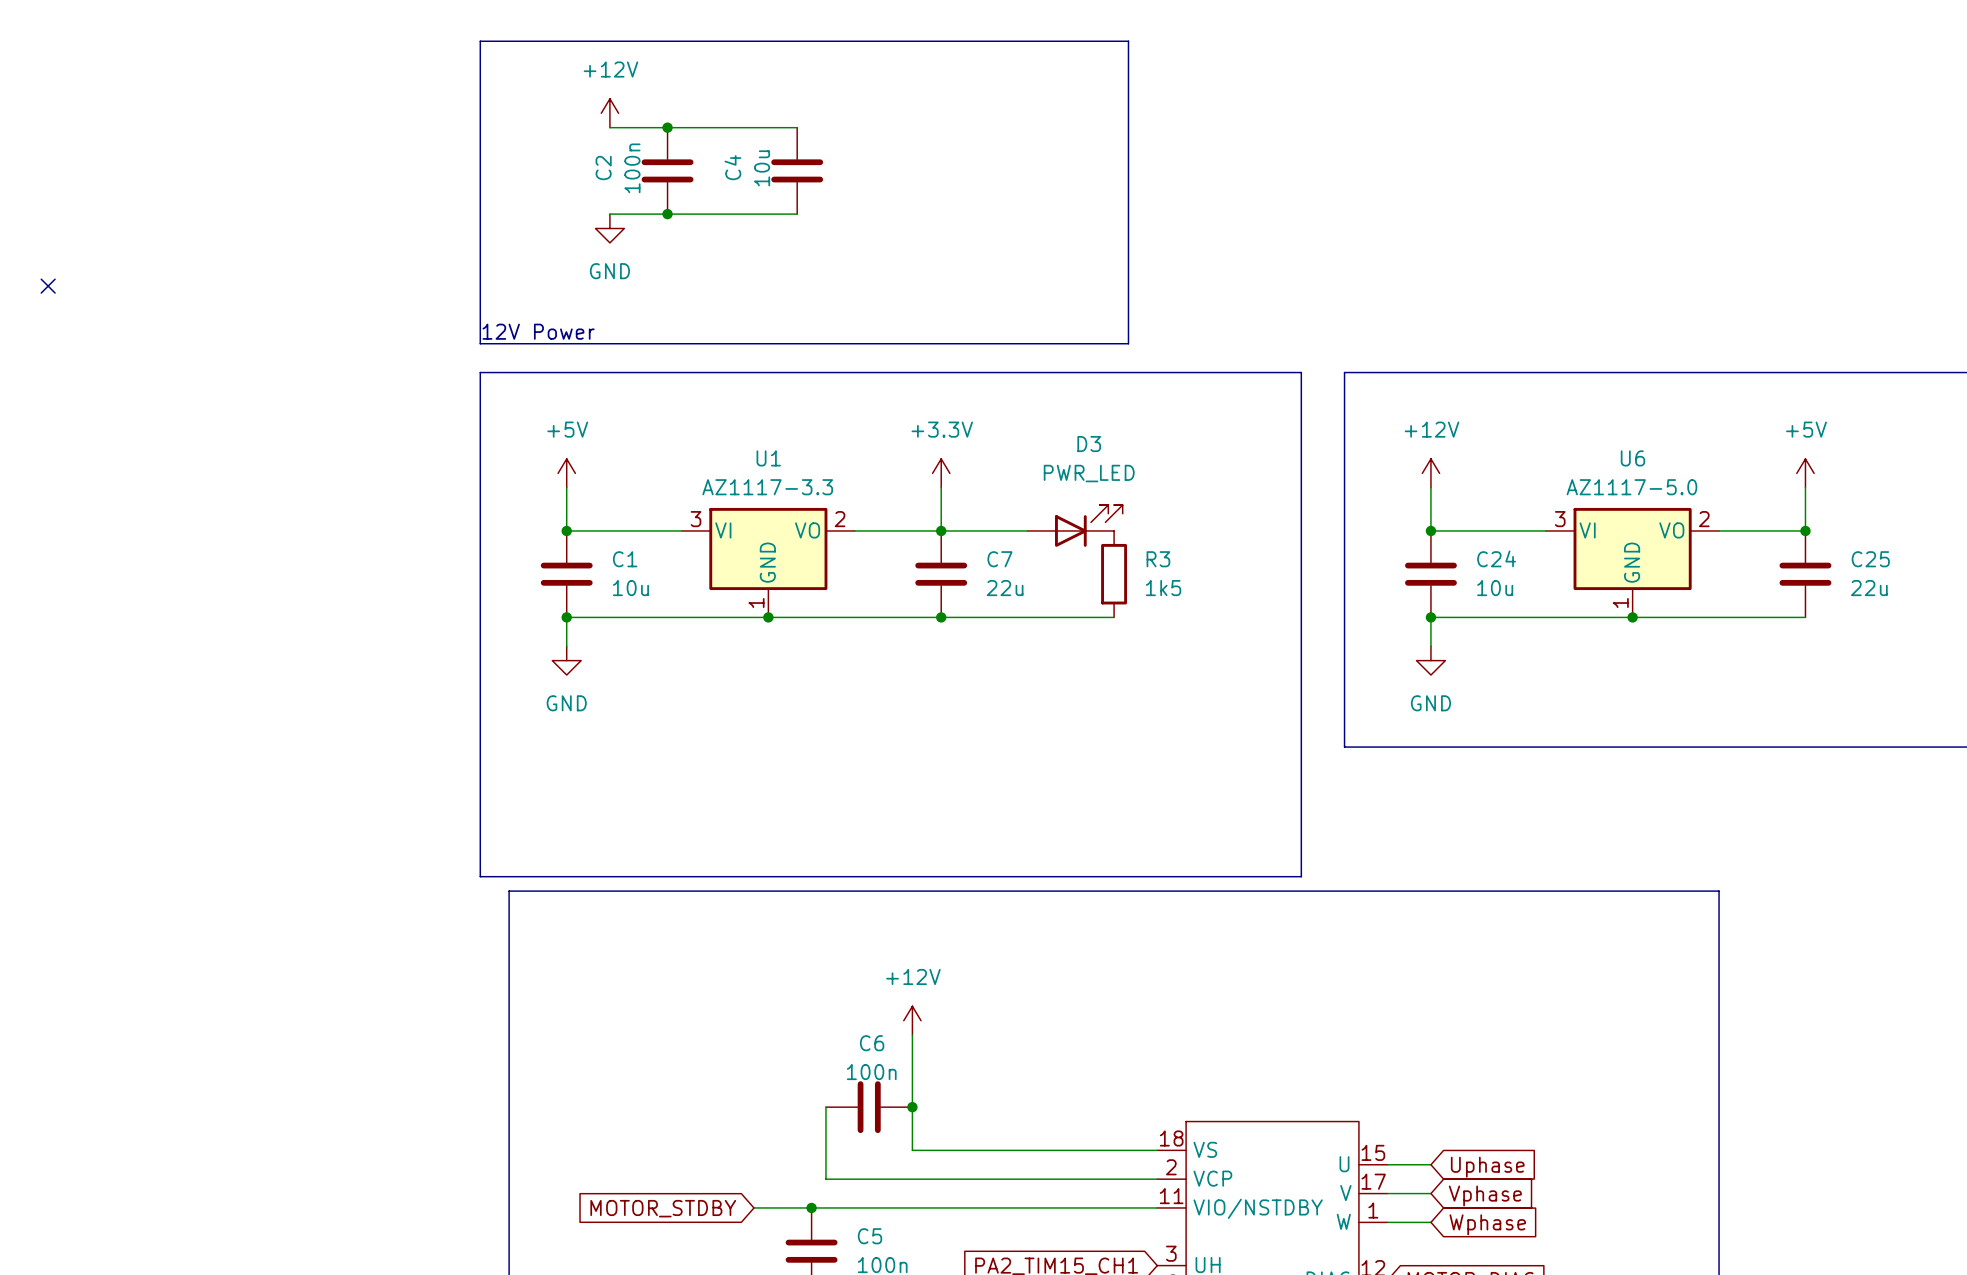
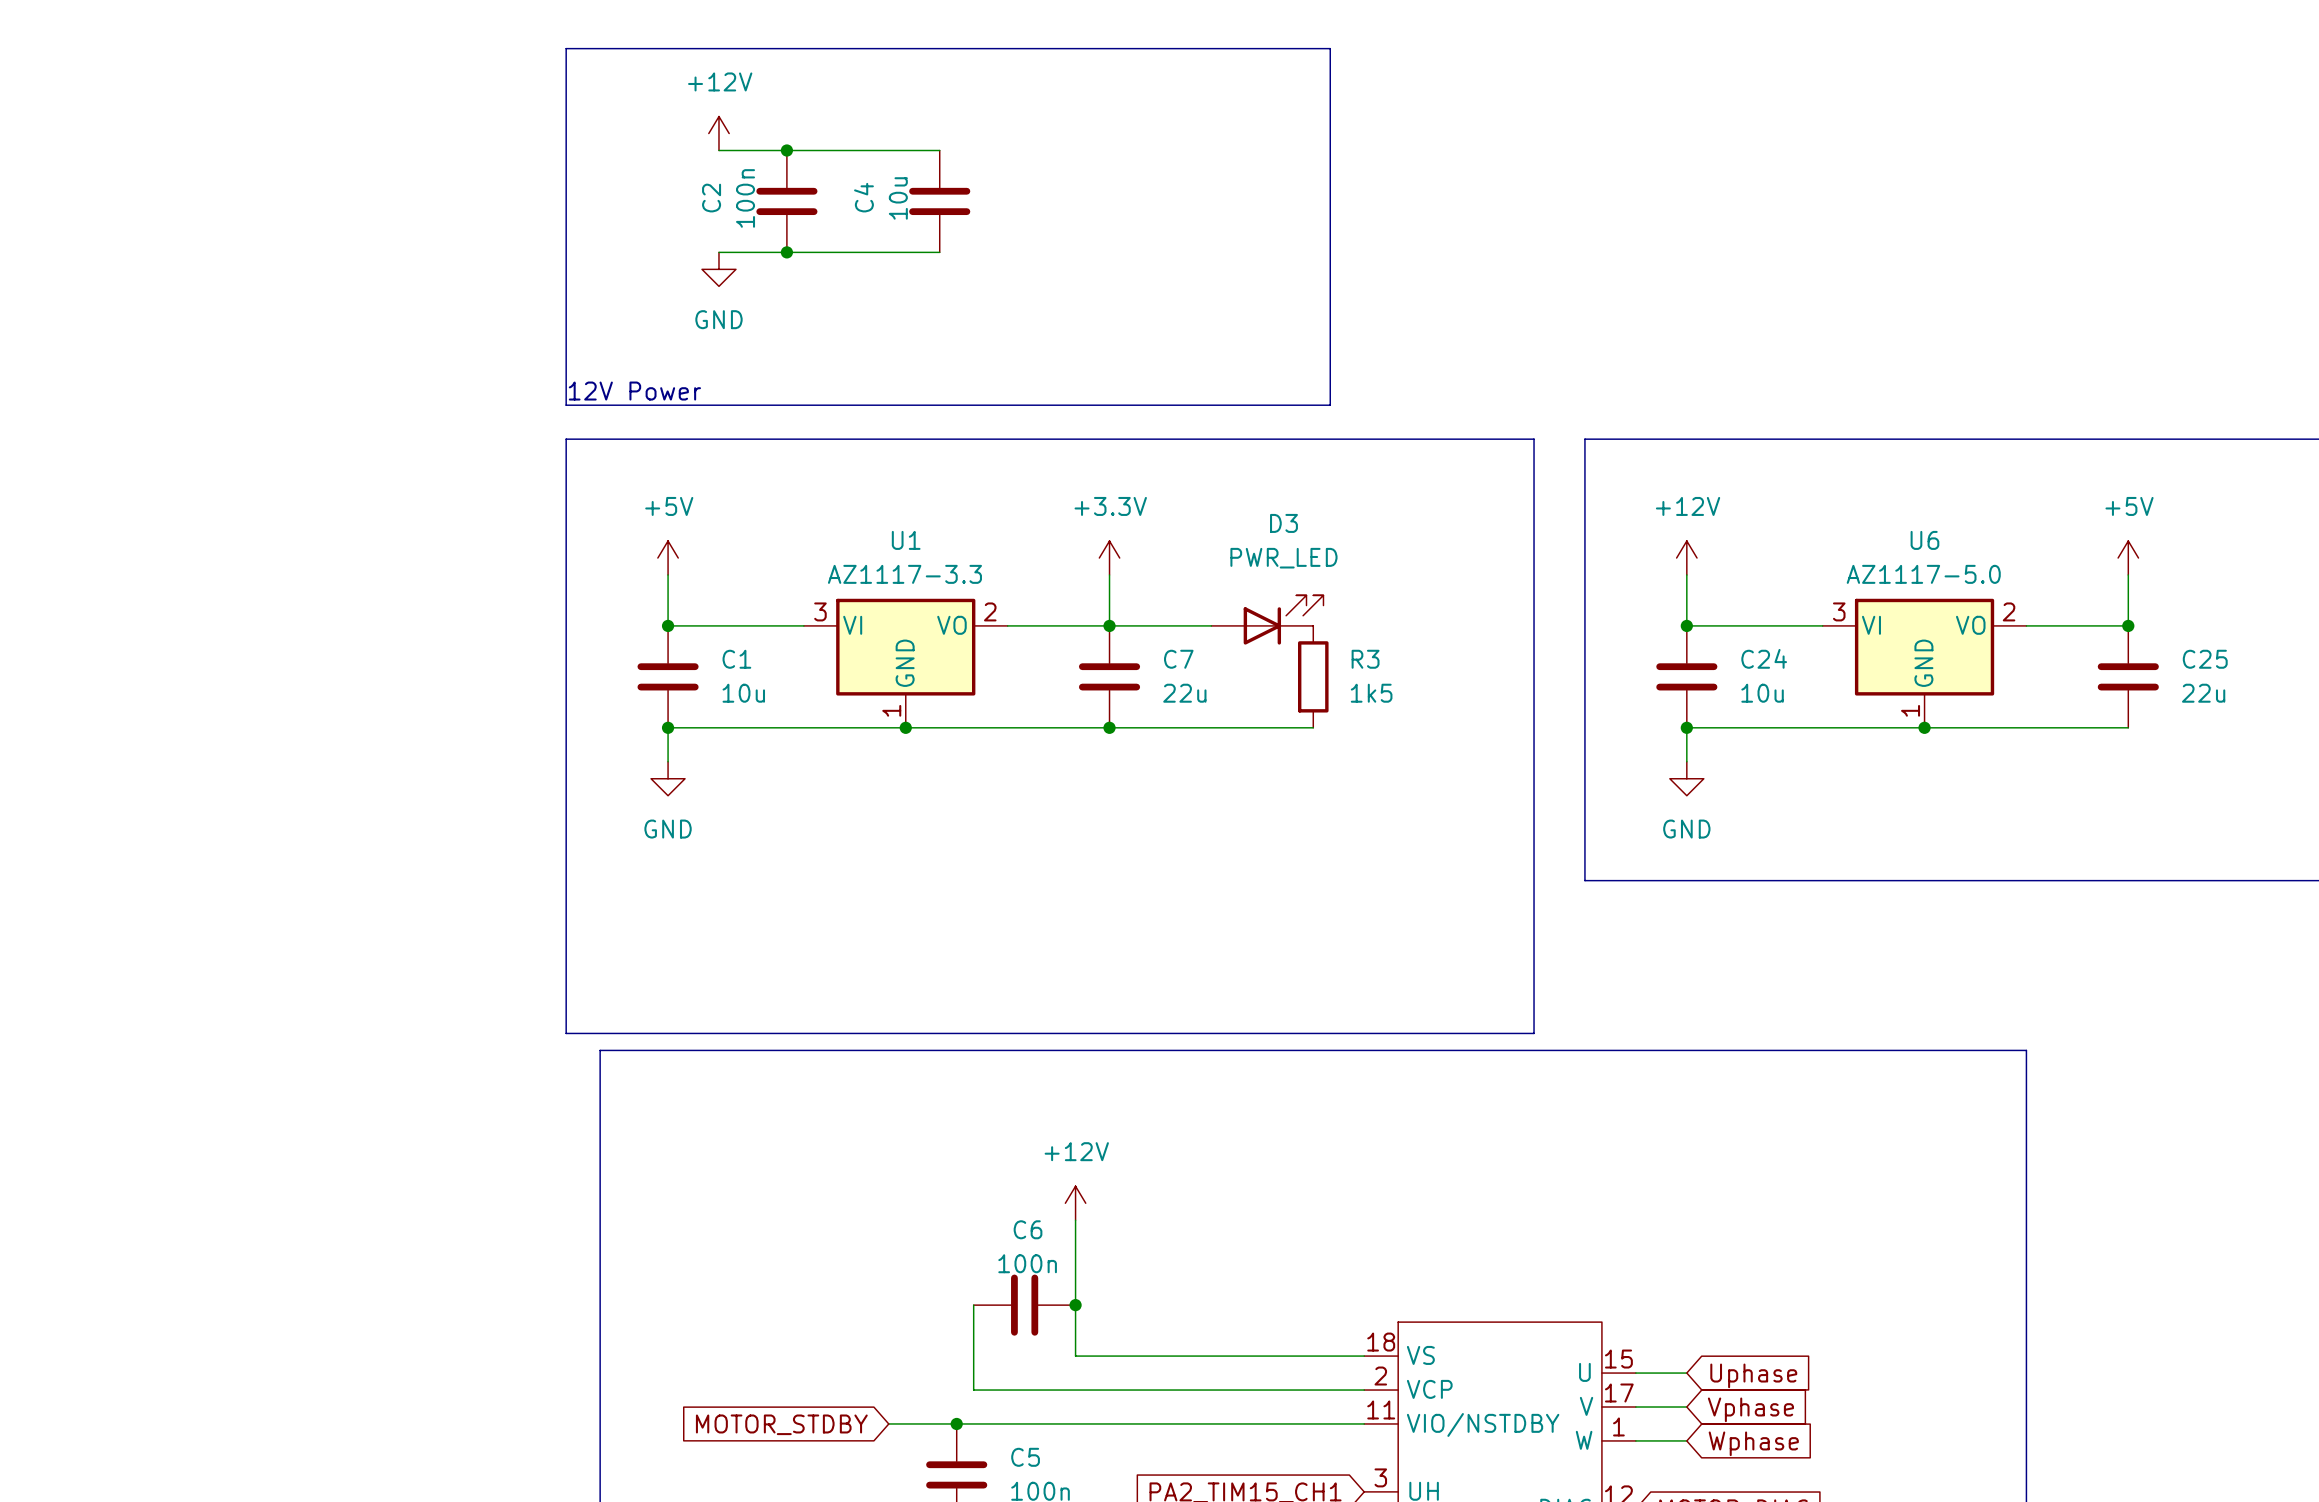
no-connect mark: (48, 286) -> none

